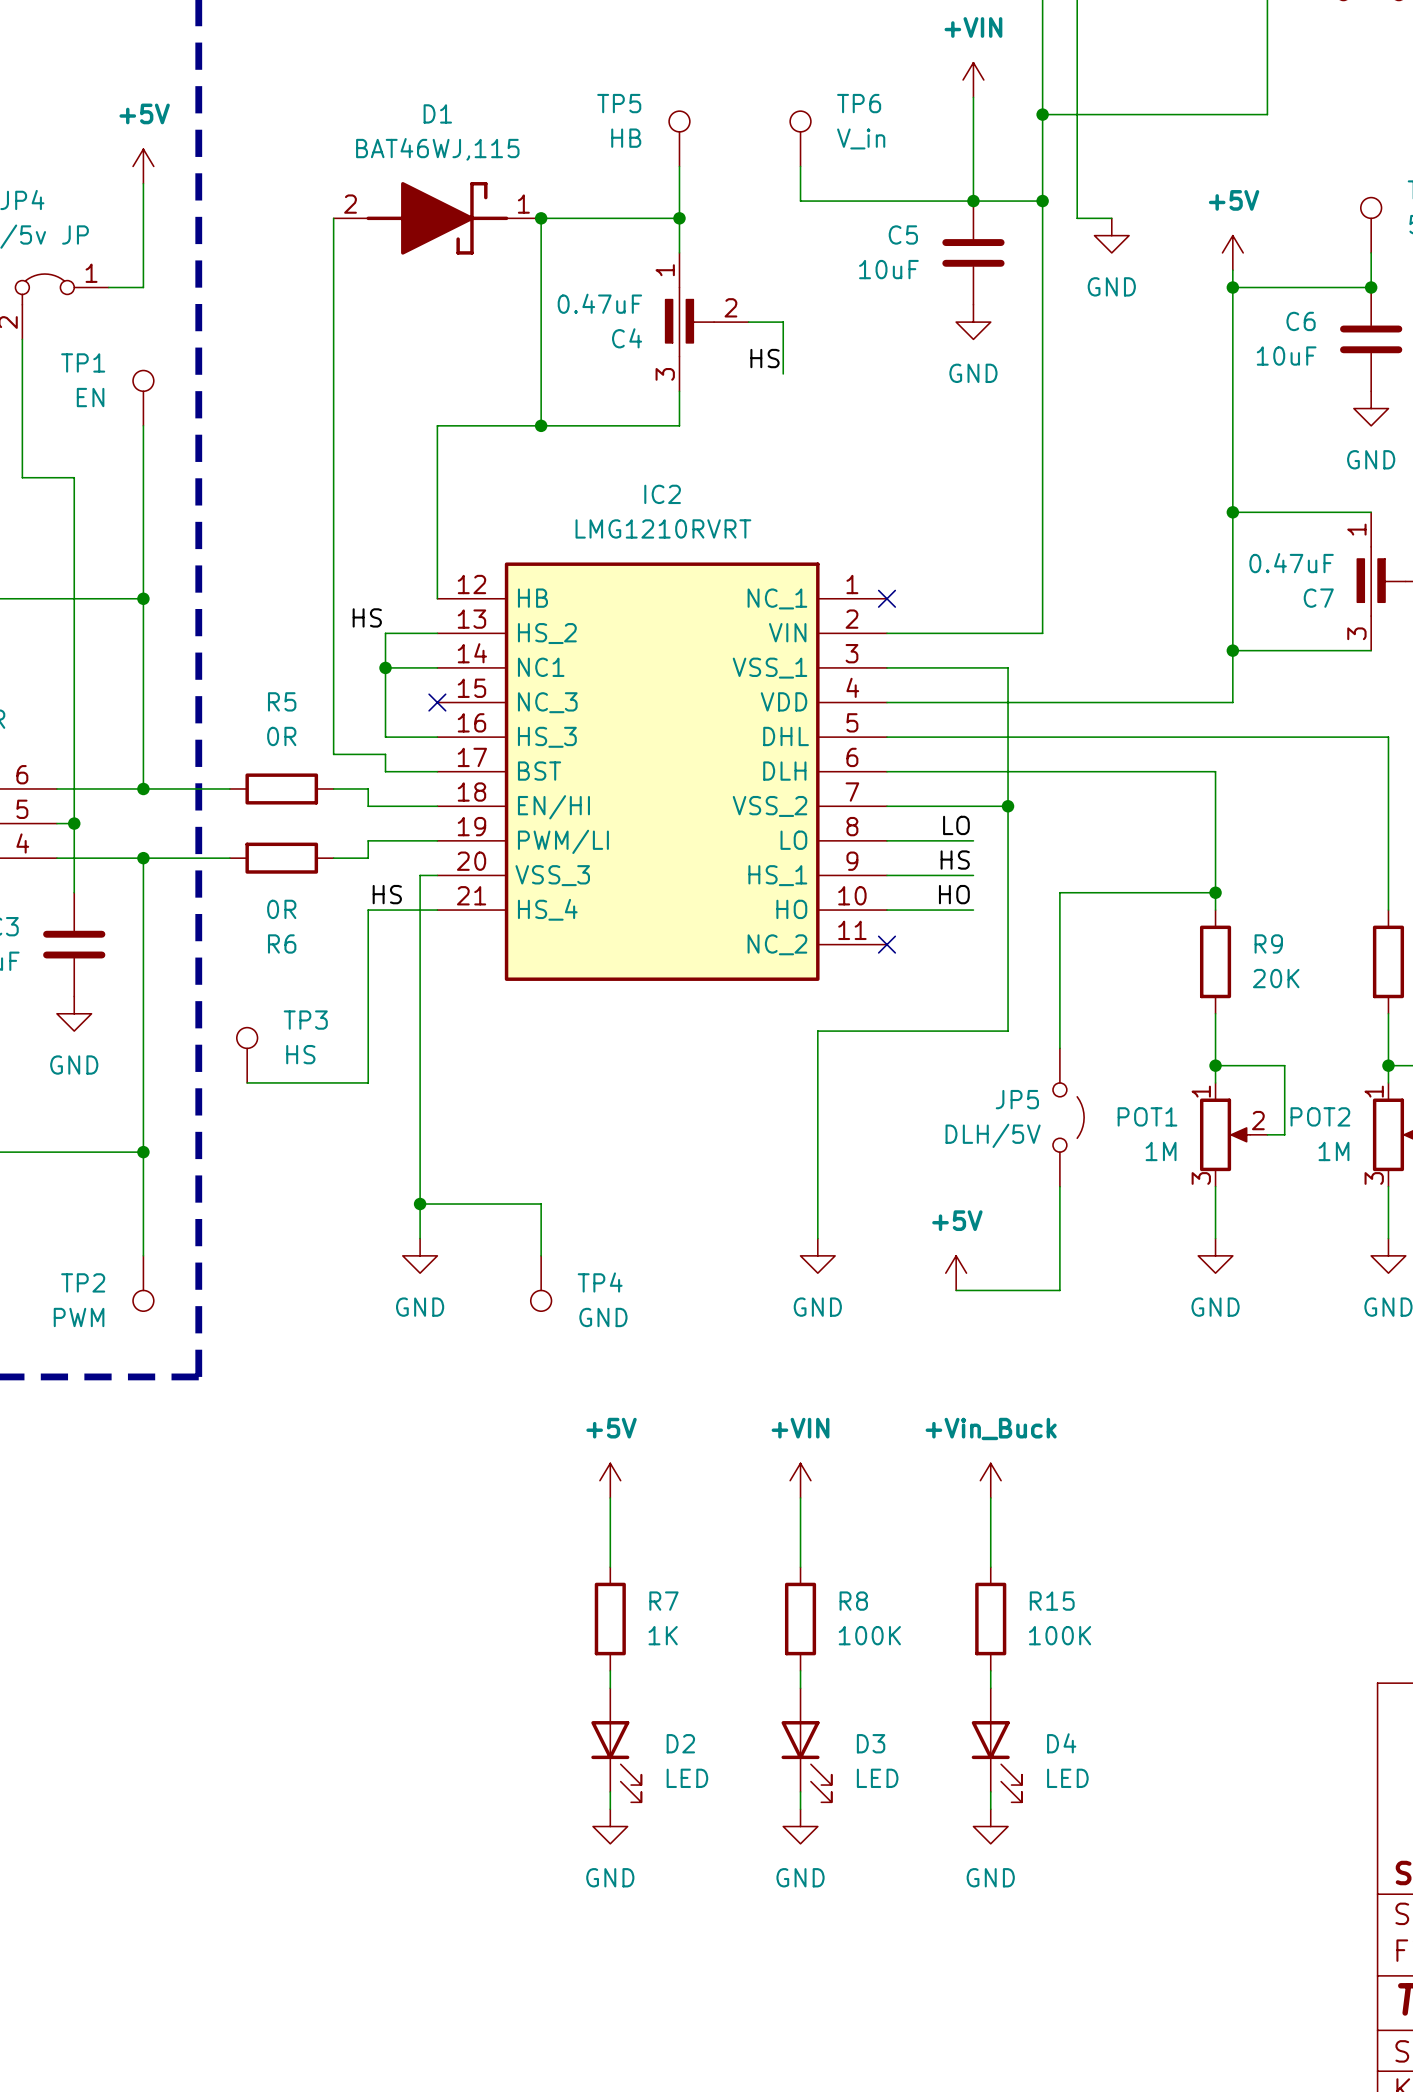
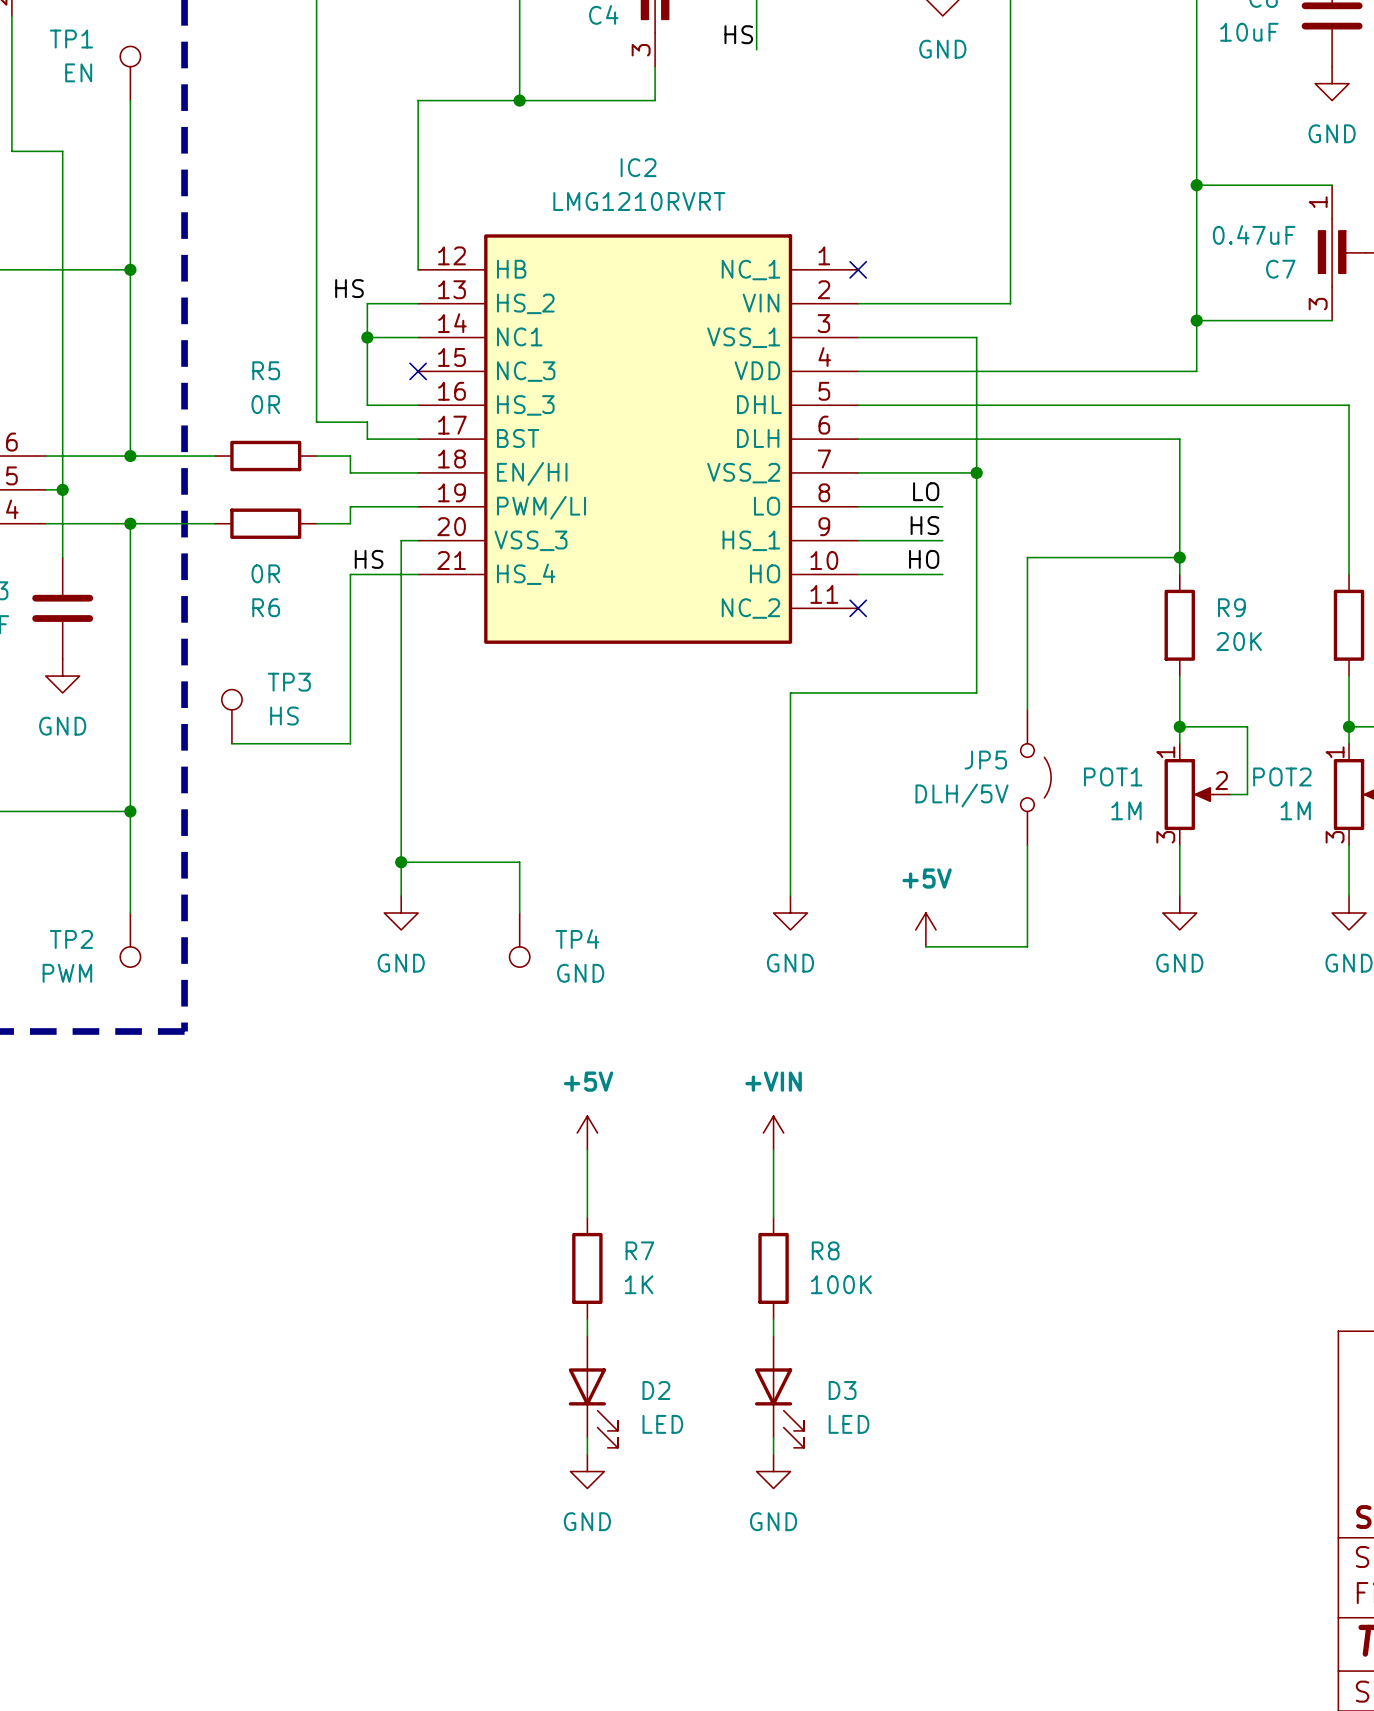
power symbol: +Vin_Buck (990, 1480) -> none
wire: (990, 1497) (990, 1567) -> none
R15: 100K (990, 1619) -> none
wire: (990, 1670) (990, 1688) -> none
D4: LED (996, 1745) -> none
wire: (990, 1791) (990, 1809) -> none
power symbol: GND (990, 1826) -> none

